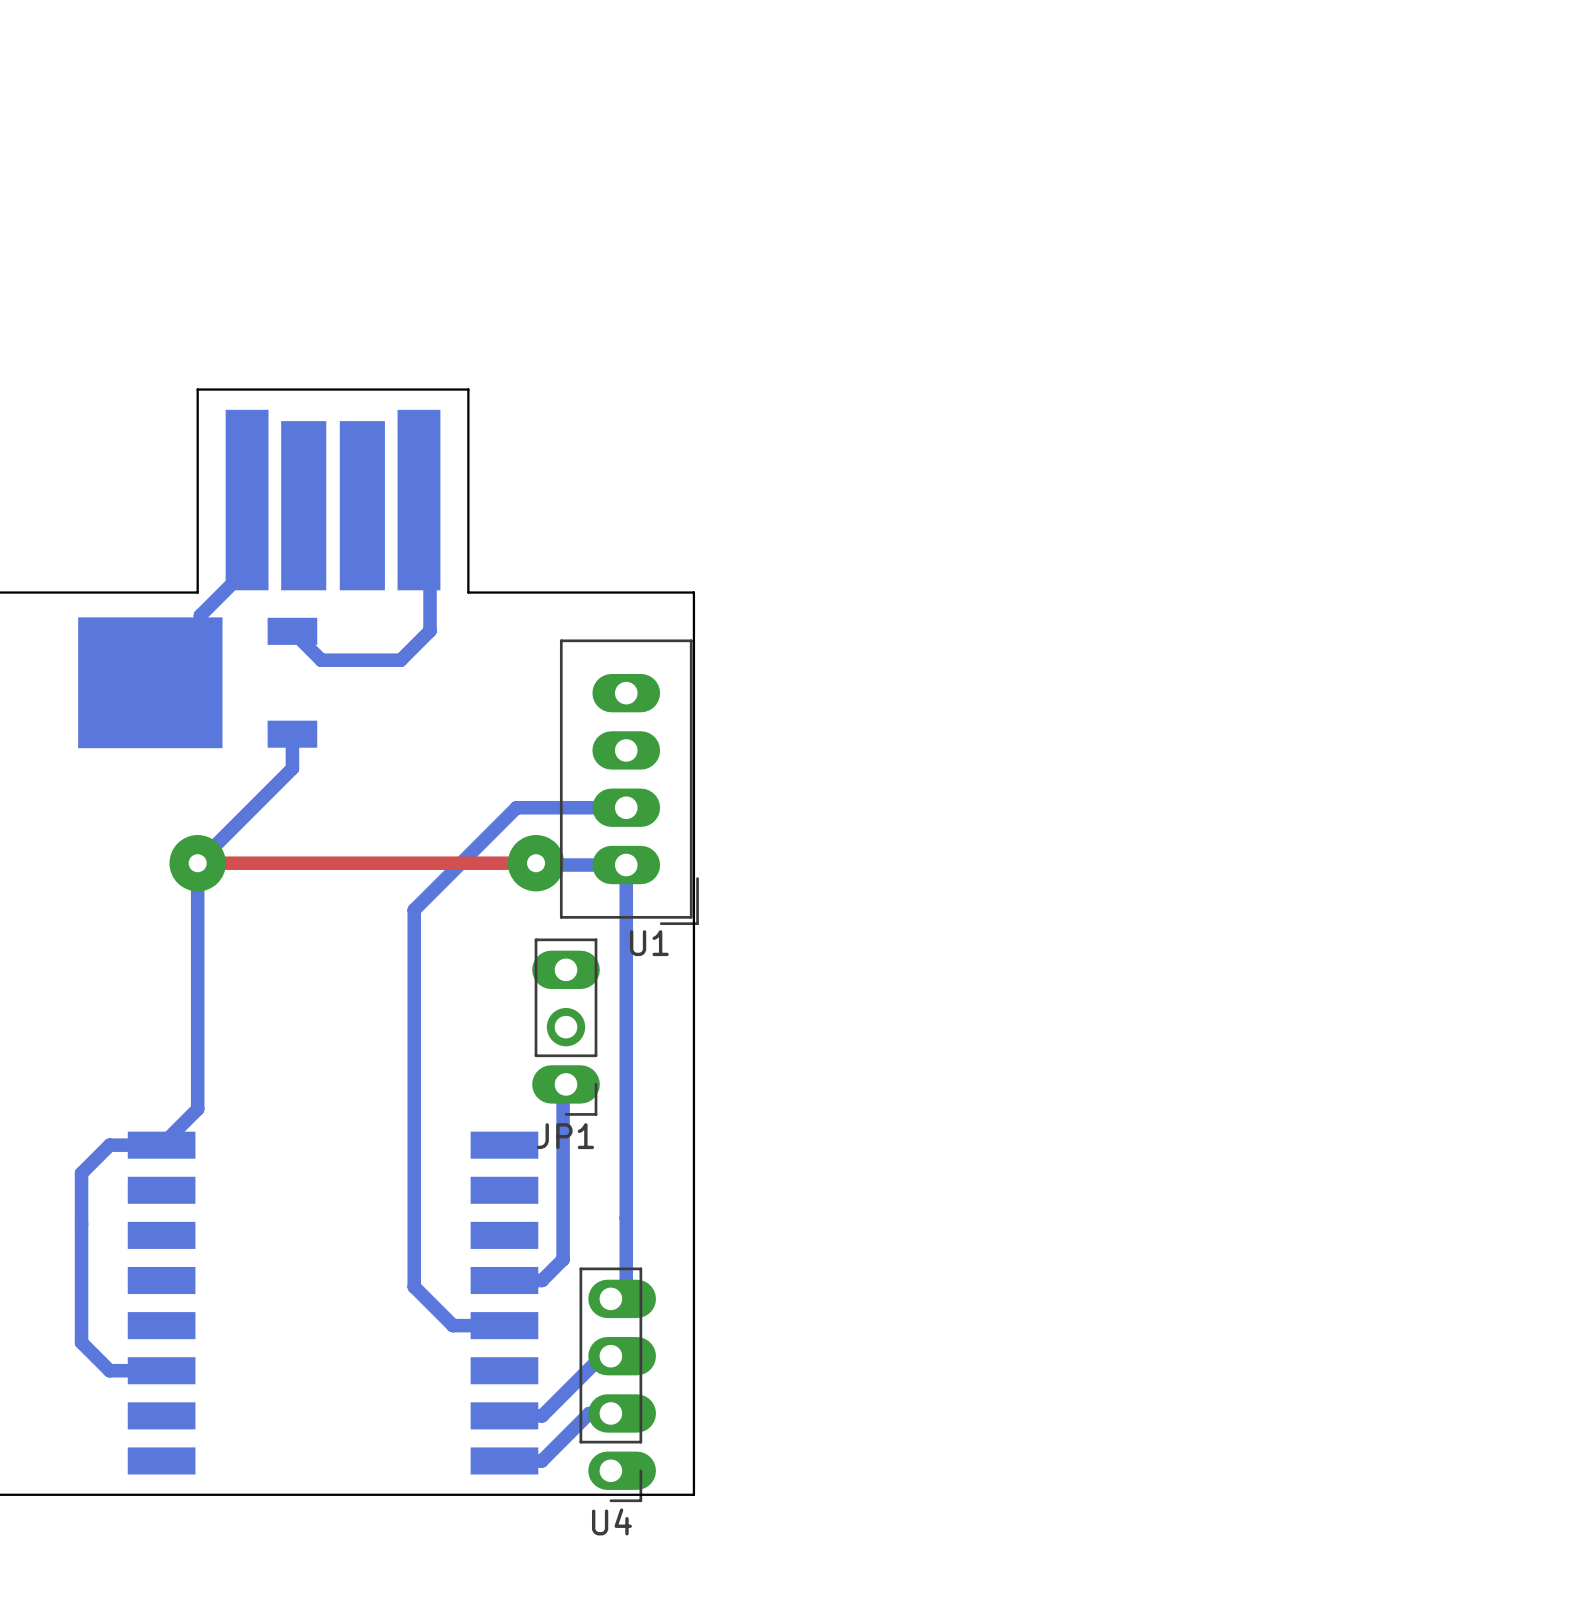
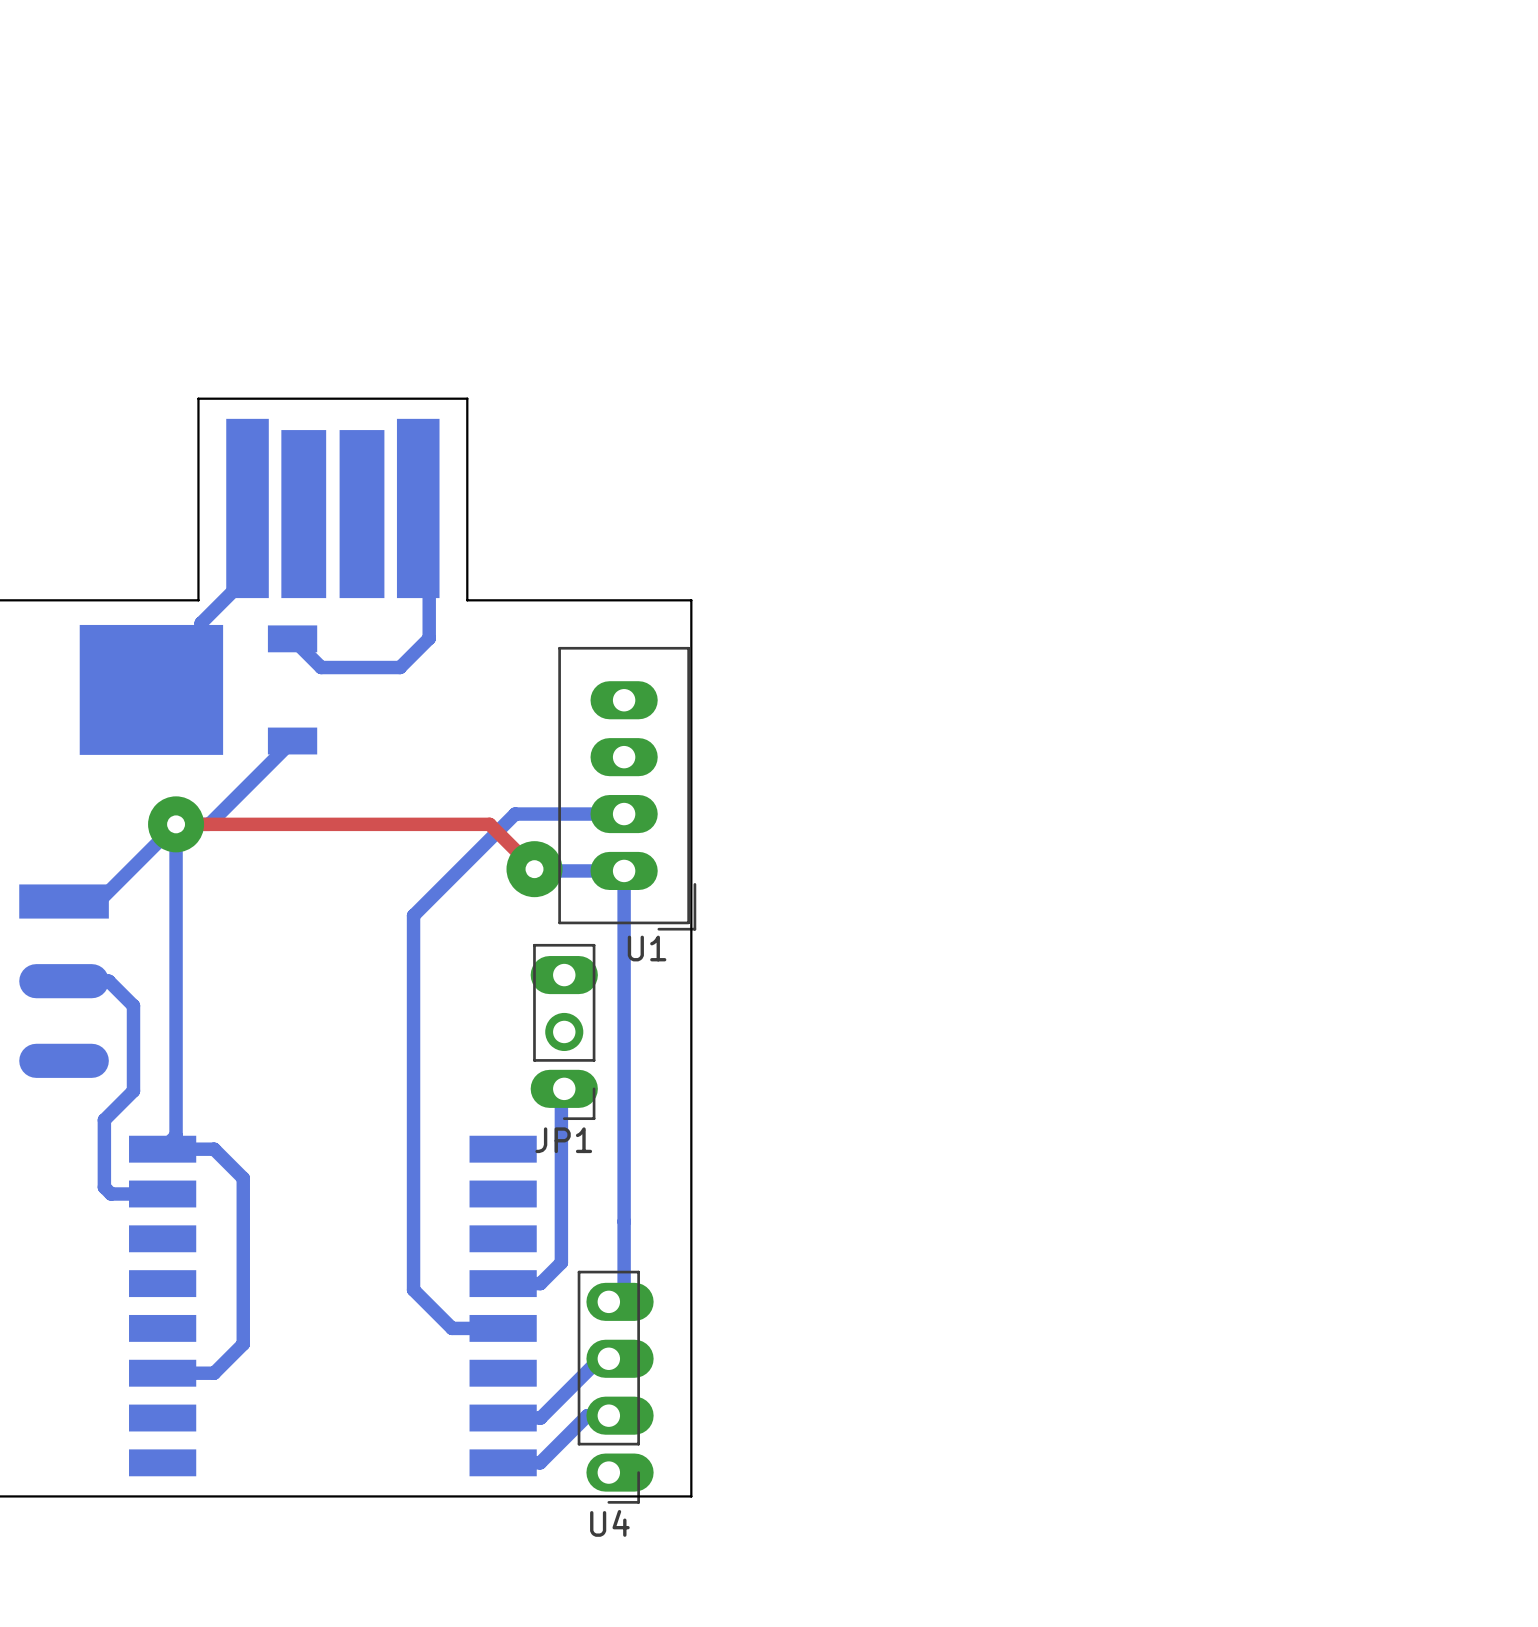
bottom track: (292, 734) (292, 768) (197, 863) (197, 1109) (175, 1131) -> (176, 824) (176, 1135)
bottom track: none -> (292, 741) (209, 824) (176, 824)
bottom track: none -> (176, 824) (98, 901) (64, 901)
top track: (197, 863) (536, 863) -> (176, 824) (489, 824) (534, 869)
via position: (197, 863) -> (176, 824)
bottom track: none -> (64, 981) (108, 981) (133, 1005) (133, 1090) (104, 1120) (104, 1187) (111, 1194) (162, 1194)
part: none -> (64, 981)
bottom track: (161, 1145) (109, 1145) (81, 1173) (81, 1342) (109, 1370) (161, 1370) -> (162, 1149) (214, 1149) (243, 1178) (243, 1344) (214, 1373) (162, 1373)

